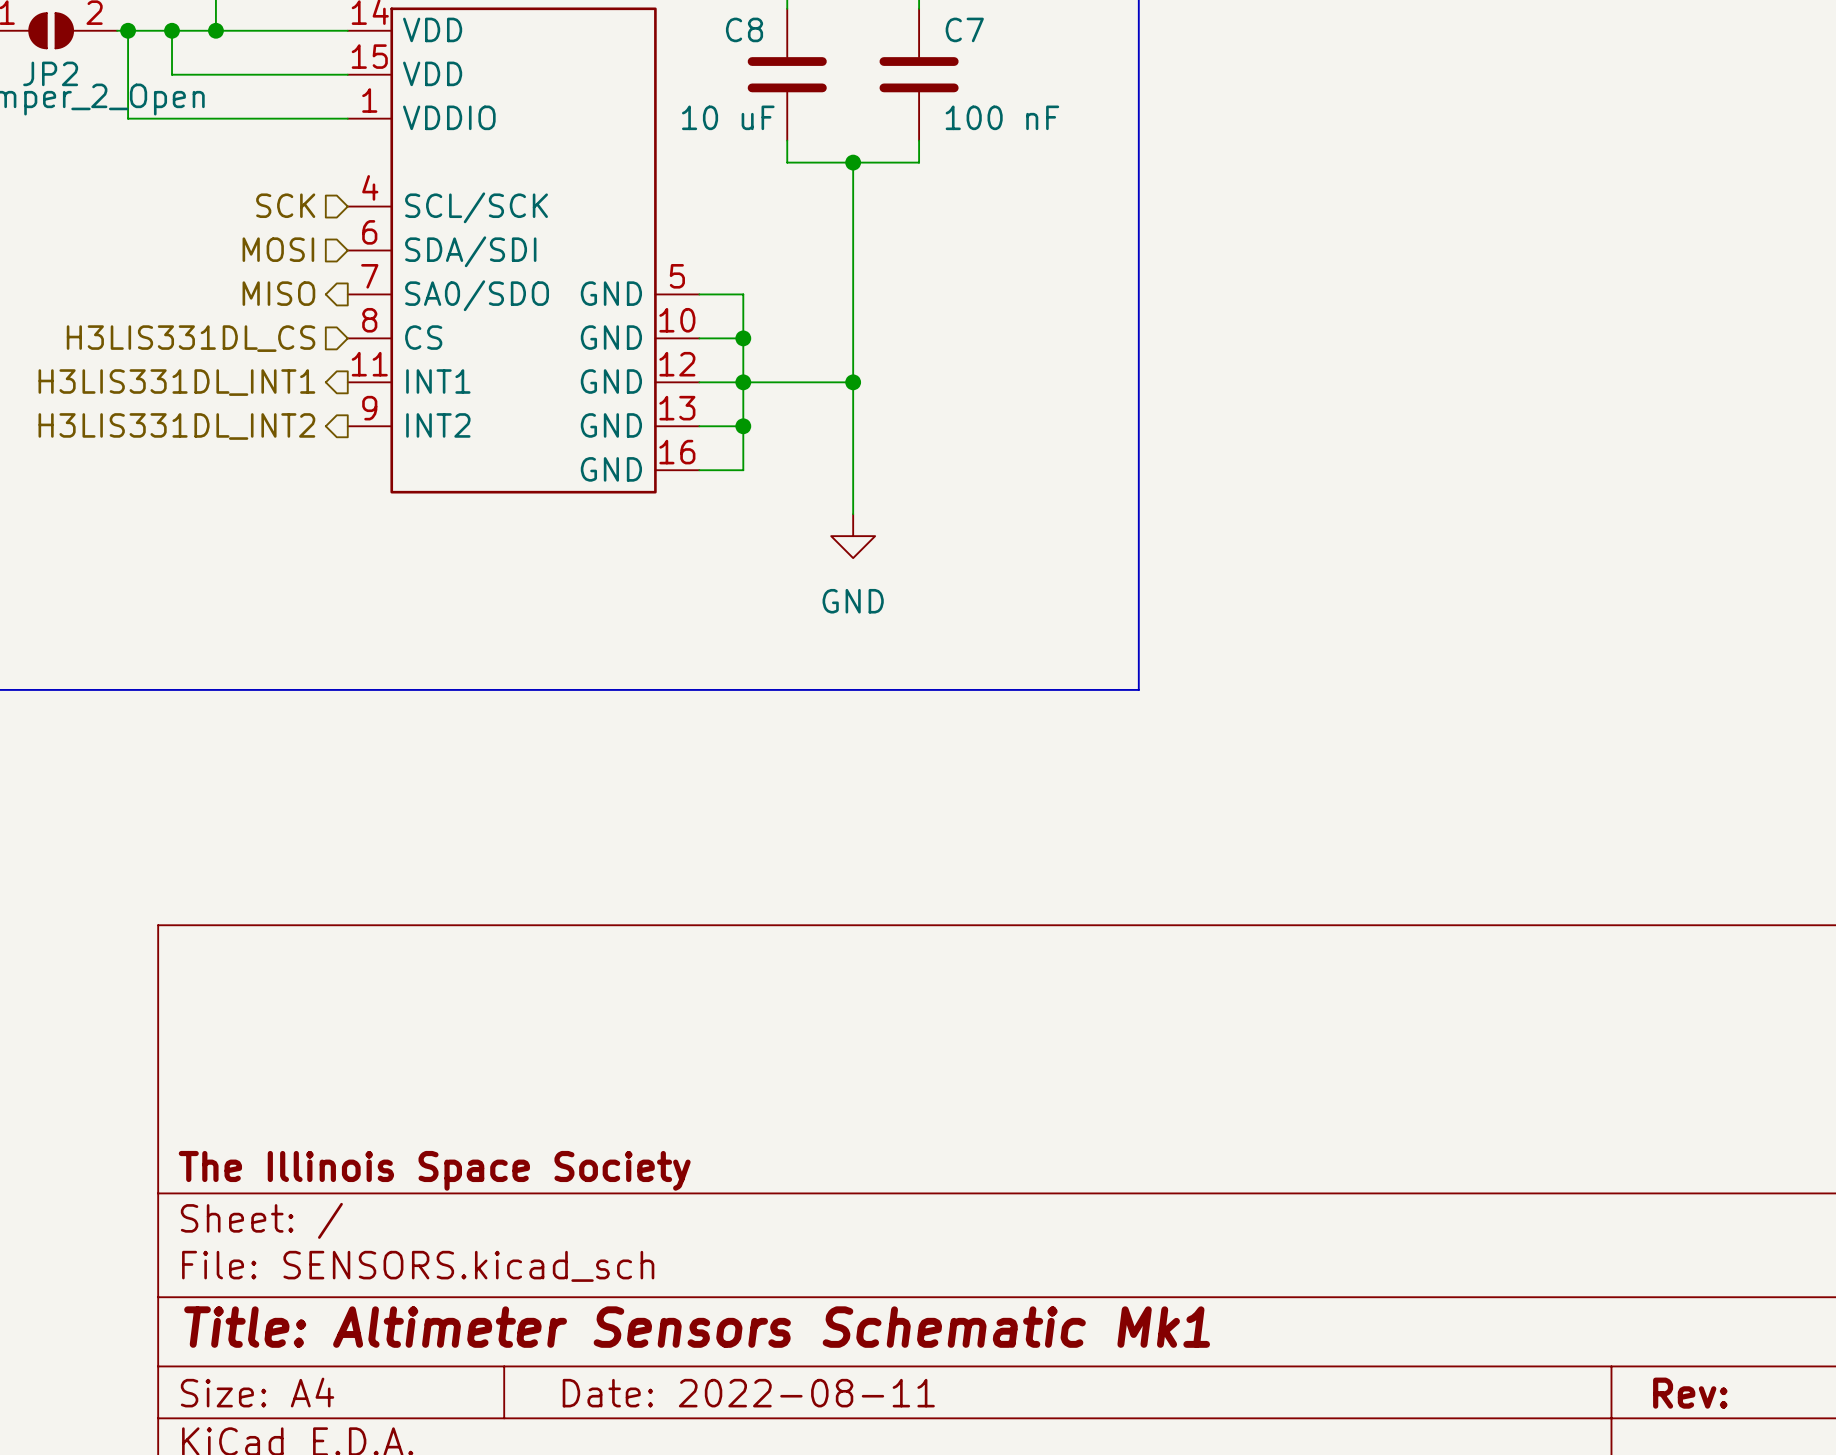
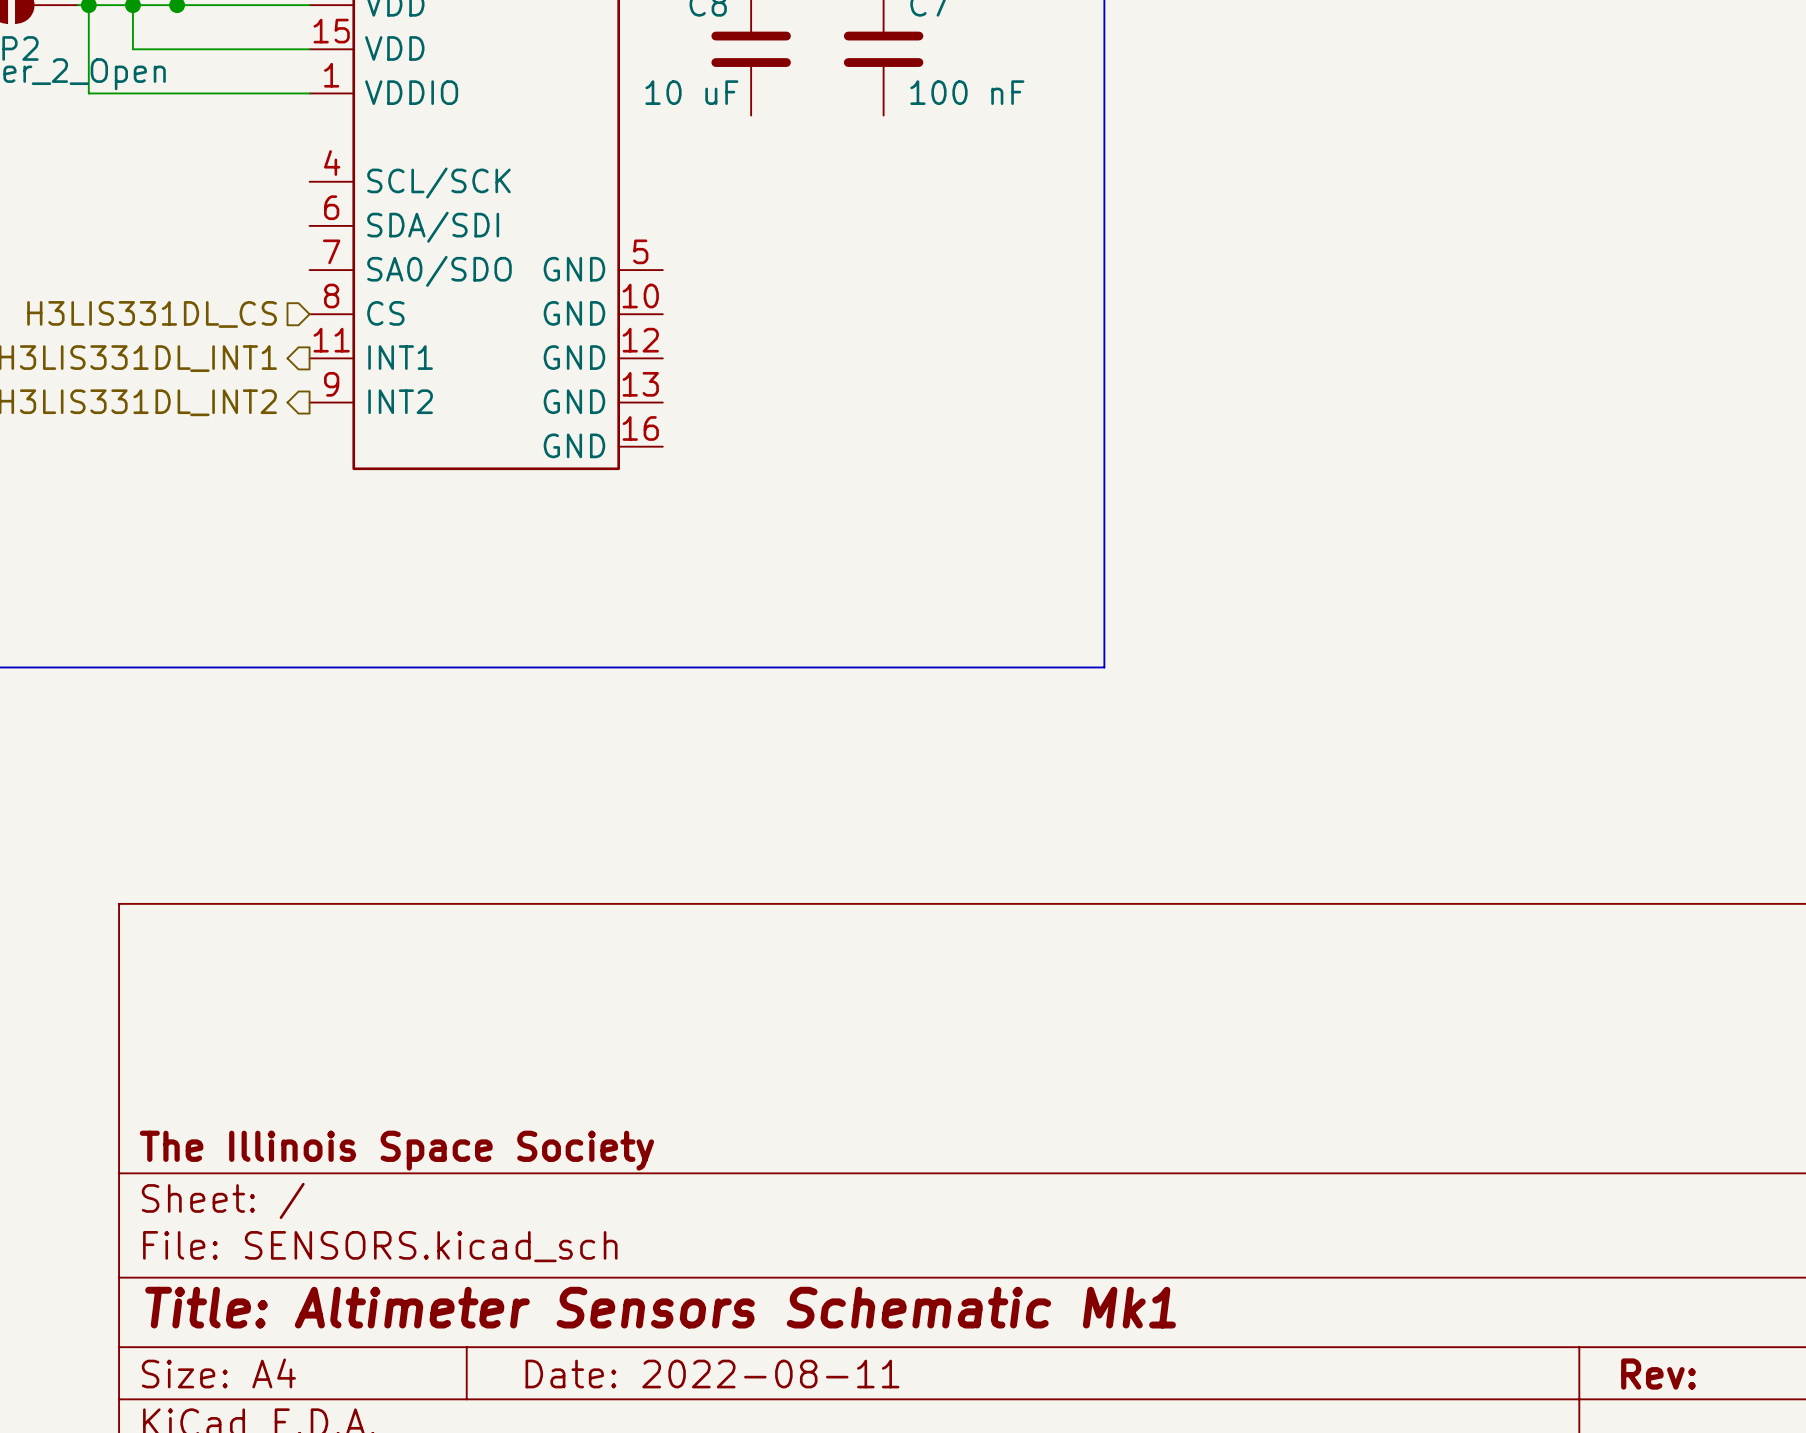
wire: (787, 140) (787, 162) (919, 162) (919, 140) -> none
wire: (853, 162) (853, 514) -> none
junction: (853, 162) -> none
hierarchical label: SCK (285, 205) -> none
hierarchical label: MOSI (278, 249) -> none
hierarchical label: MISO (278, 293) -> none
wire: (699, 294) (743, 294) (743, 470) (699, 470) -> none
wire: (699, 338) (743, 338) -> none
junction: (743, 338) -> none
wire: (699, 382) (853, 382) -> none
junction: (743, 382) -> none
junction: (853, 382) -> none
wire: (699, 426) (743, 426) -> none
junction: (743, 426) -> none
power symbol: GND (853, 536) -> none

